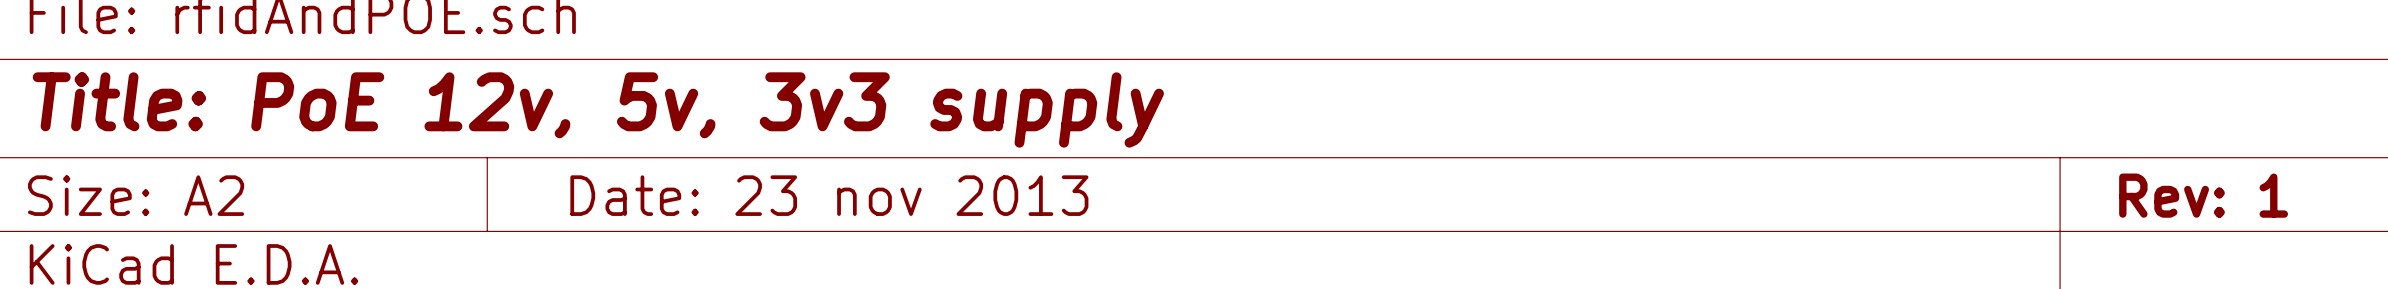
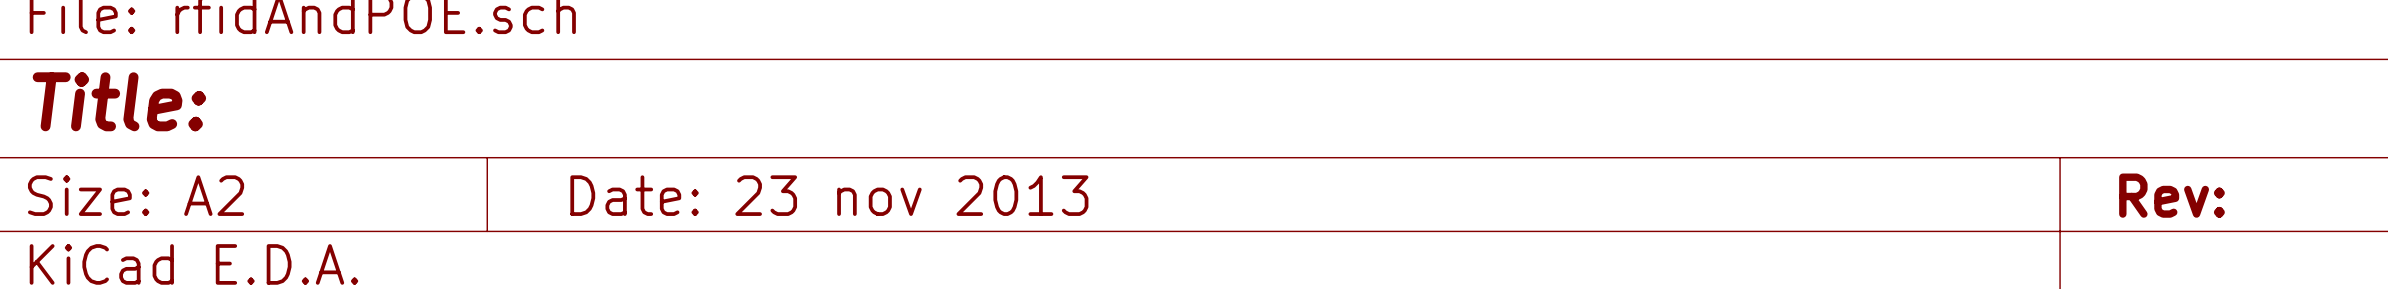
title block: Title: PoE 12v, 5v, 3v3 supply (598, 109) -> Title: (119, 101)
title block: Rev: 1 (2203, 195) -> Rev: (2171, 195)

